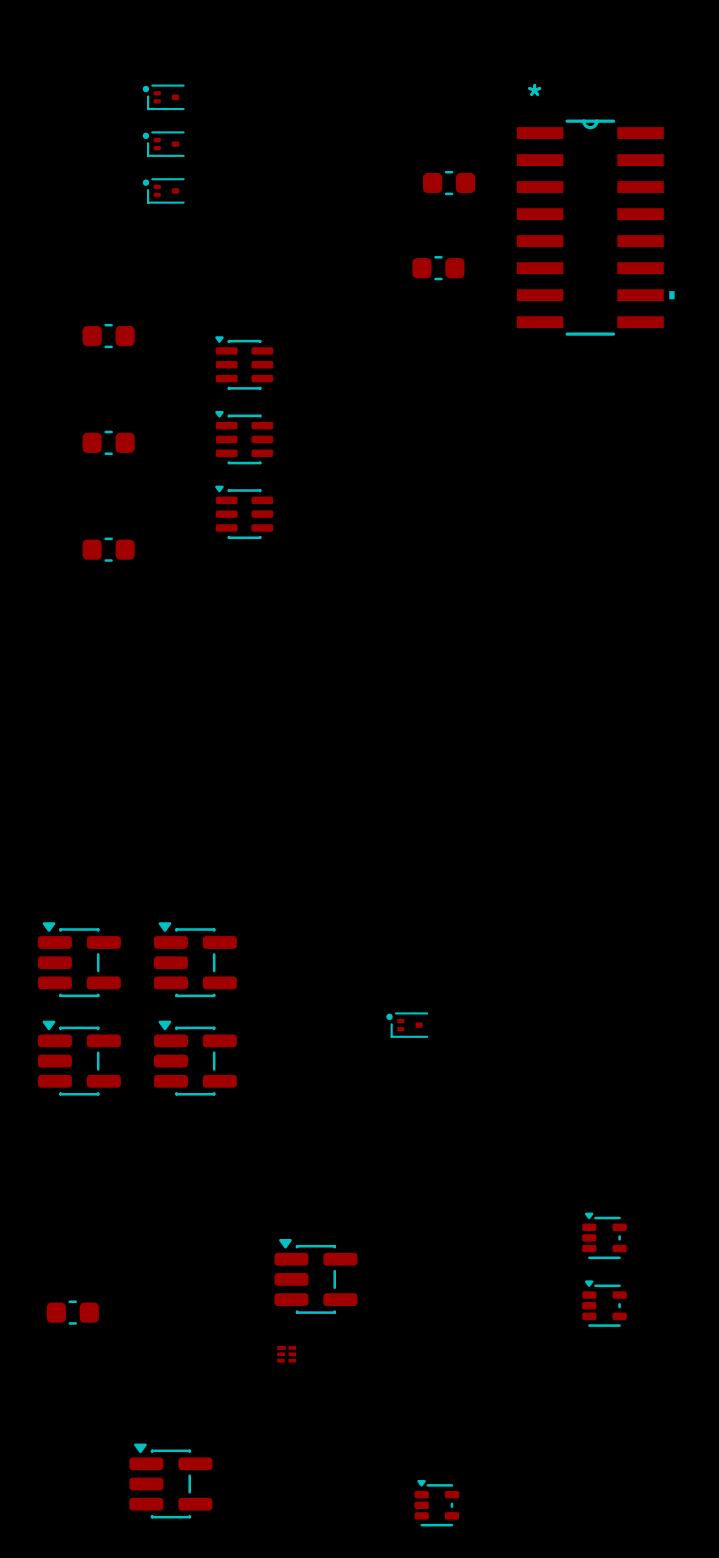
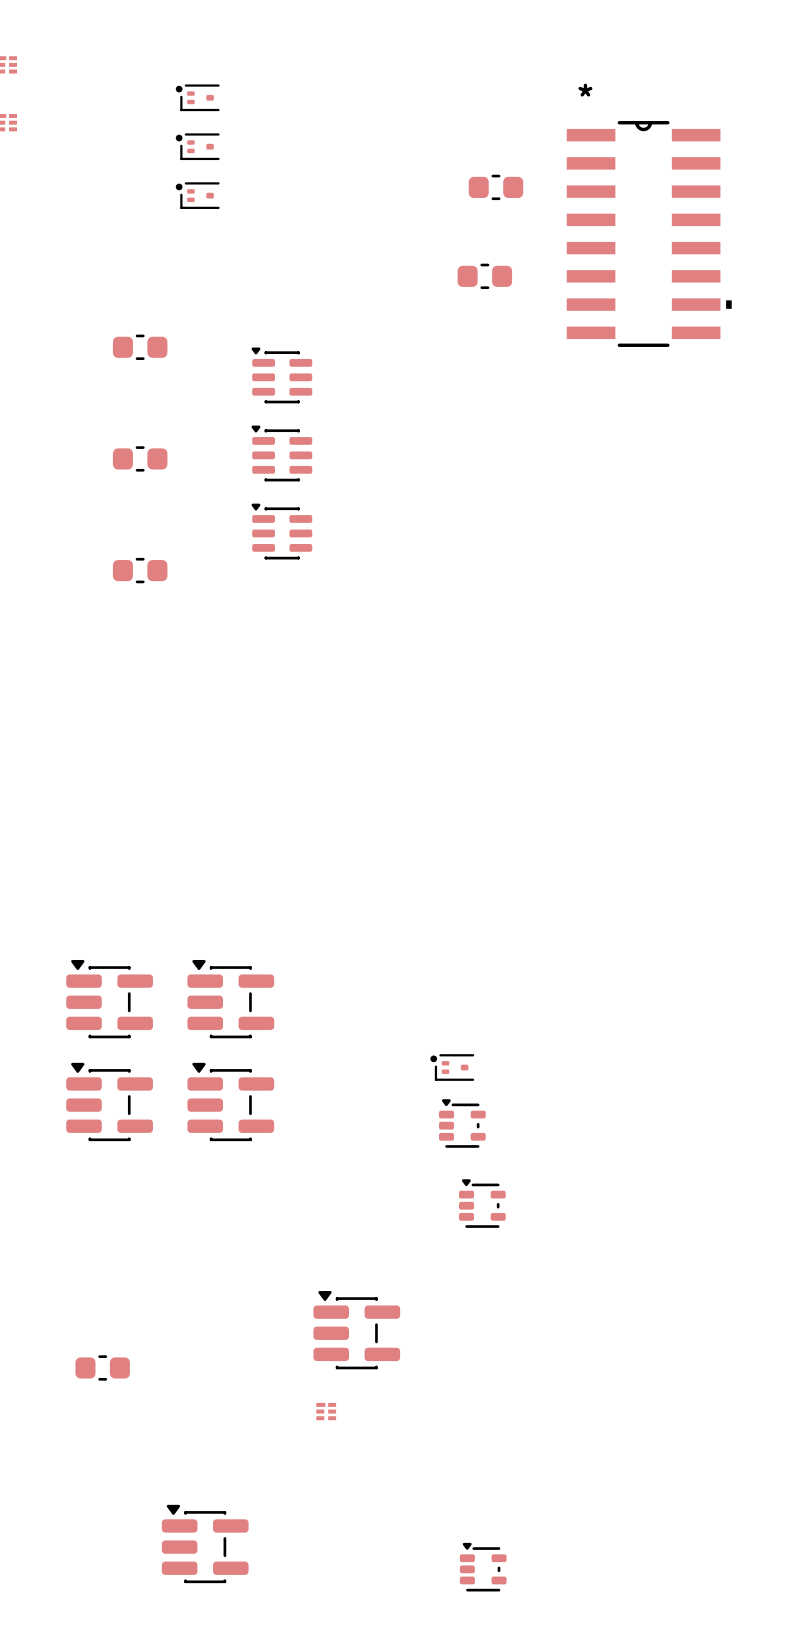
part: none -> (462, 1123)
part: none -> (482, 1203)
part: (604, 1235) -> none
part: (604, 1303) -> none

